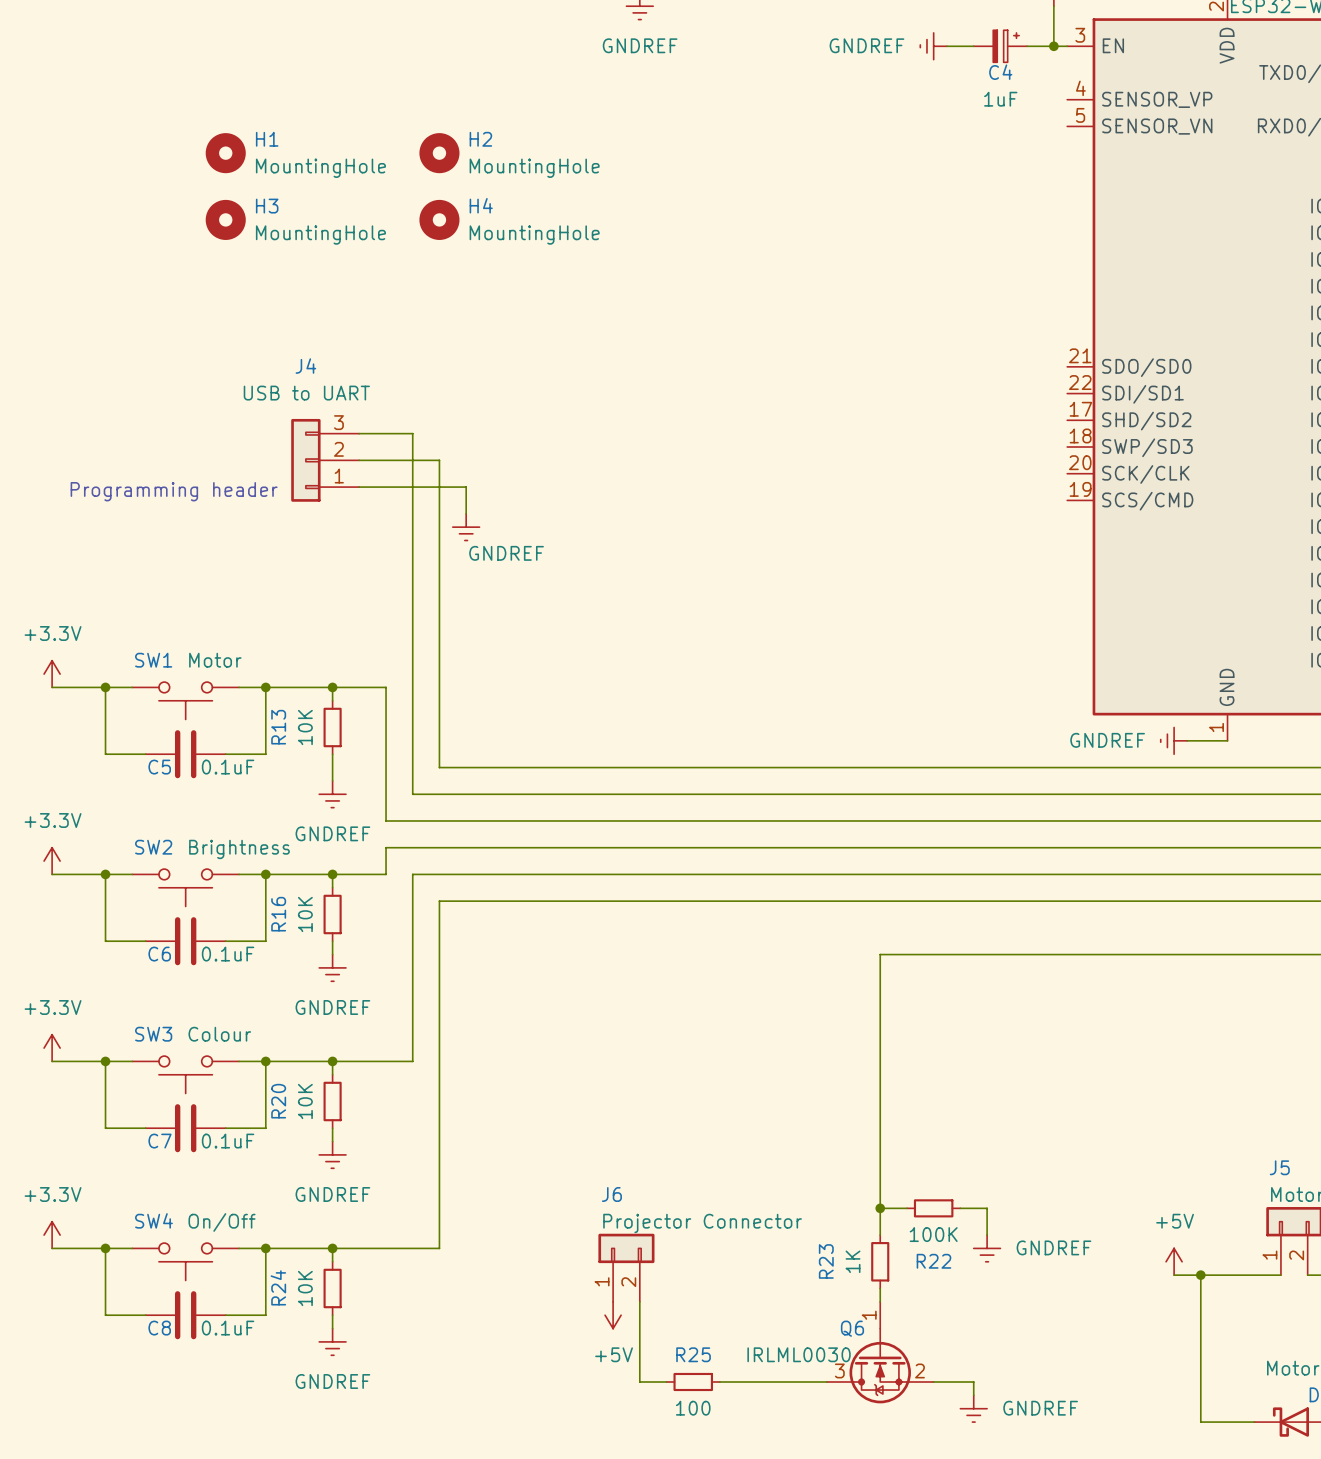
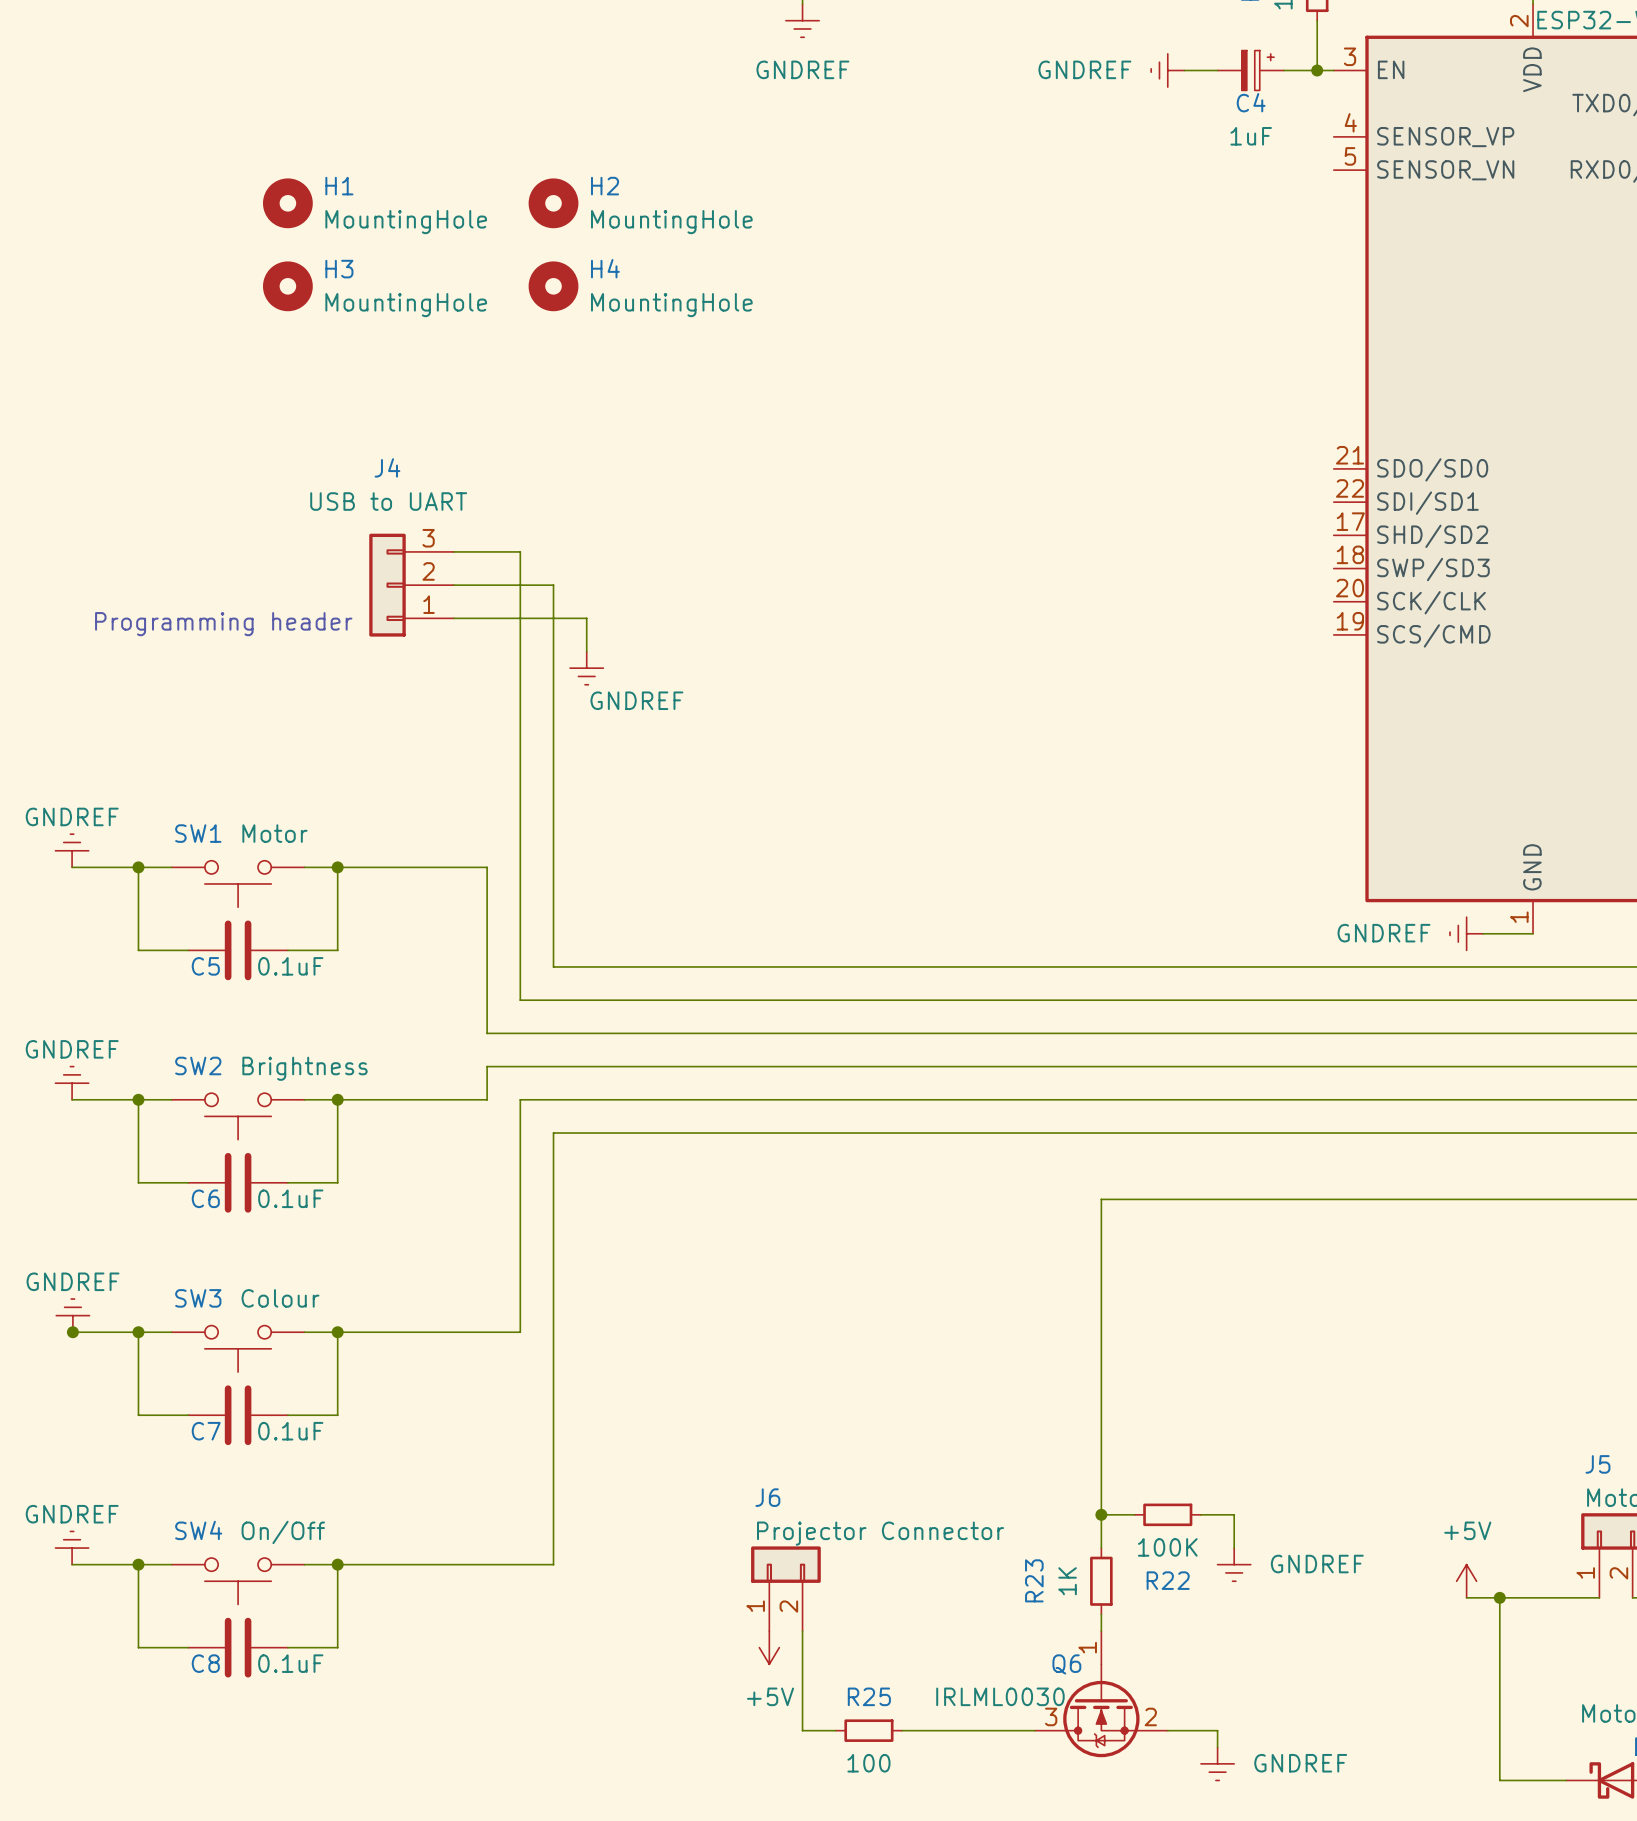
power symbol: +3.3V (52, 674) -> GNDREF (72, 850)
wire: (332, 687) (332, 700) -> none
junction: (332, 687) -> none
R13: 10K (332, 727) -> none
wire: (332, 754) (332, 780) -> none
power symbol: GNDREF (332, 794) -> none
power symbol: +3.3V (52, 861) -> GNDREF (72, 1083)
wire: (332, 874) (332, 887) -> none
junction: (332, 874) -> none
R16: 10K (332, 914) -> none
wire: (332, 941) (332, 954) -> none
power symbol: GNDREF (332, 967) -> none
power symbol: +3.3V (52, 1048) -> GNDREF (72, 1315)
junction: none -> (72, 1332)
wire: (332, 1061) (332, 1074) -> none
junction: (332, 1061) -> none
R20: 10K (332, 1101) -> none
wire: (332, 1128) (332, 1141) -> none
power symbol: GNDREF (332, 1154) -> none
power symbol: +3.3V (52, 1235) -> GNDREF (72, 1548)
wire: (332, 1248) (332, 1261) -> none
junction: (332, 1248) -> none
R24: 10K (332, 1288) -> none
wire: (332, 1315) (332, 1328) -> none
power symbol: GNDREF (332, 1341) -> none

